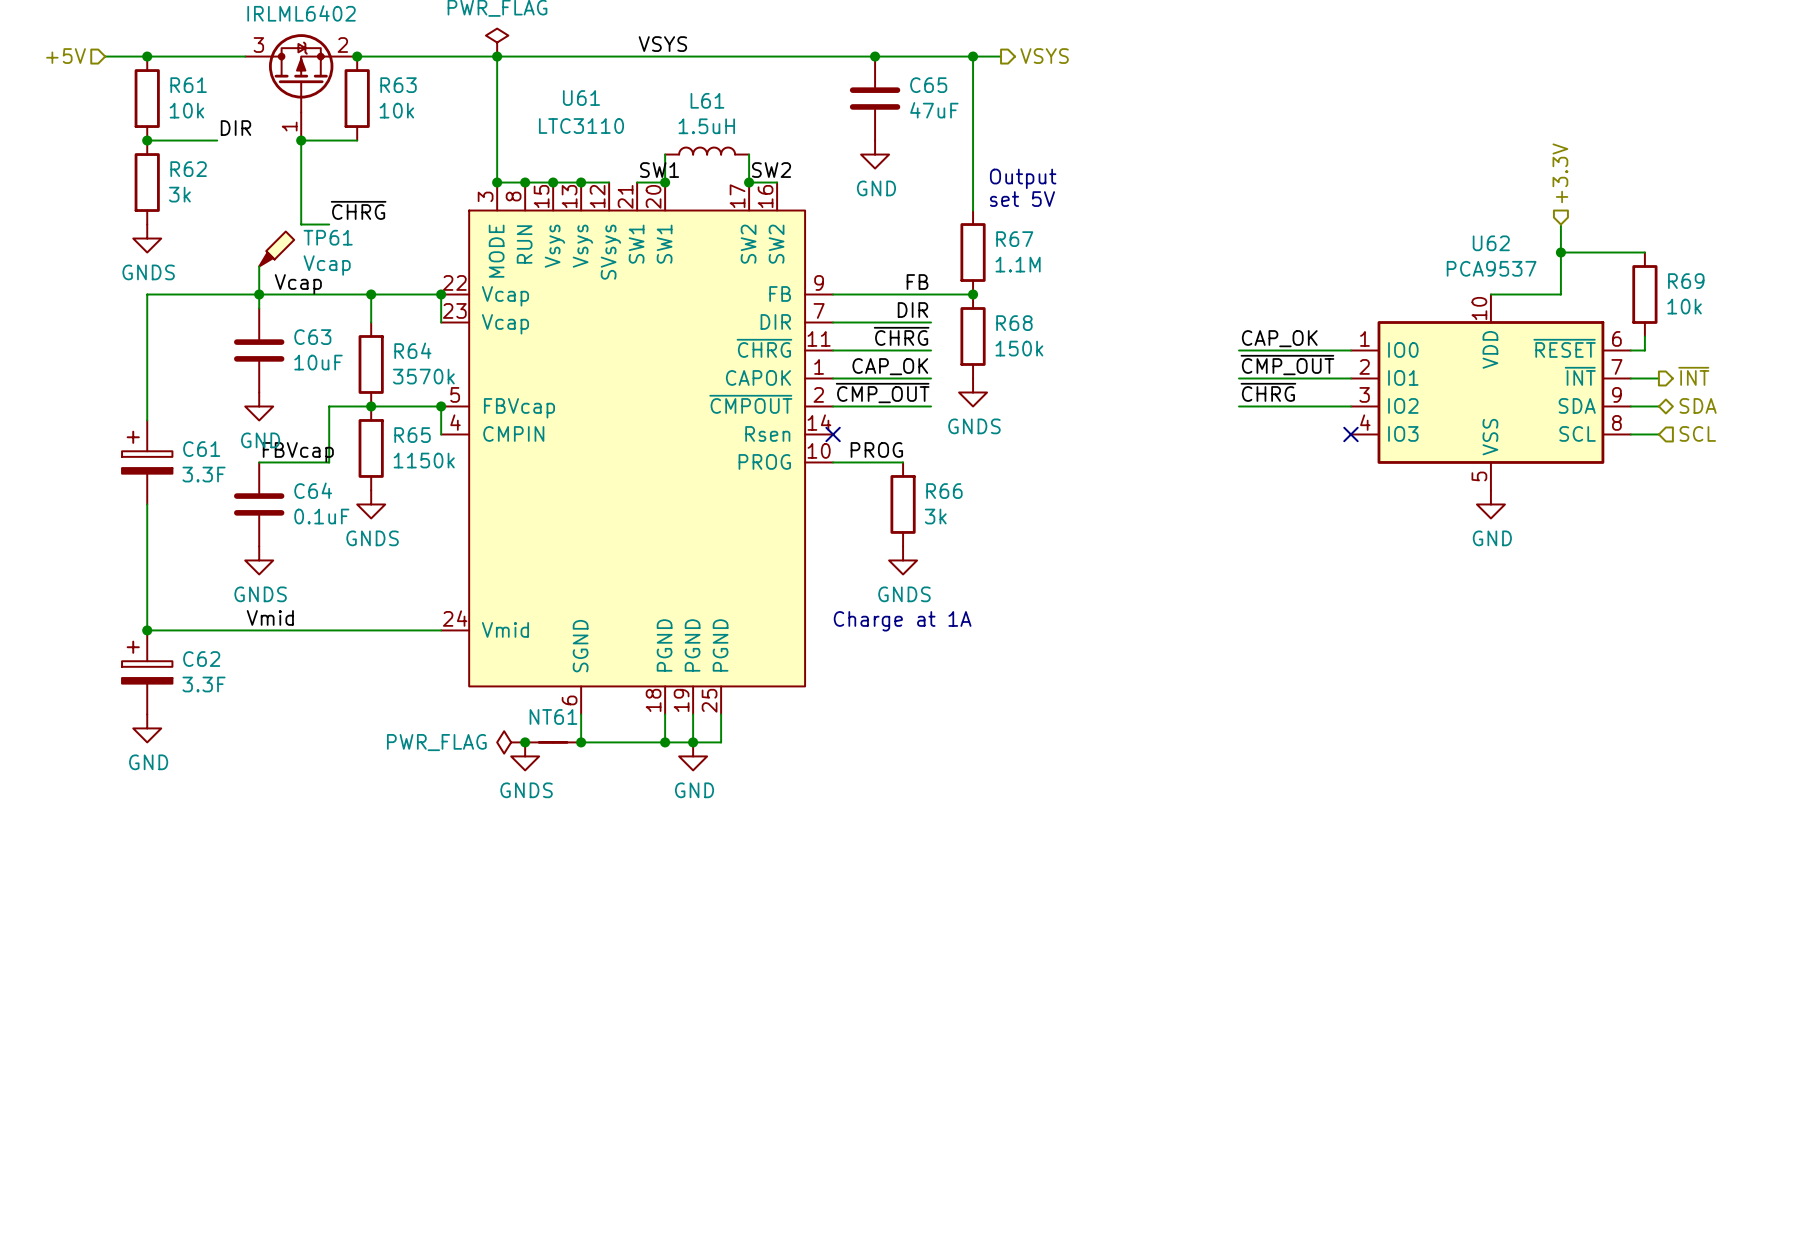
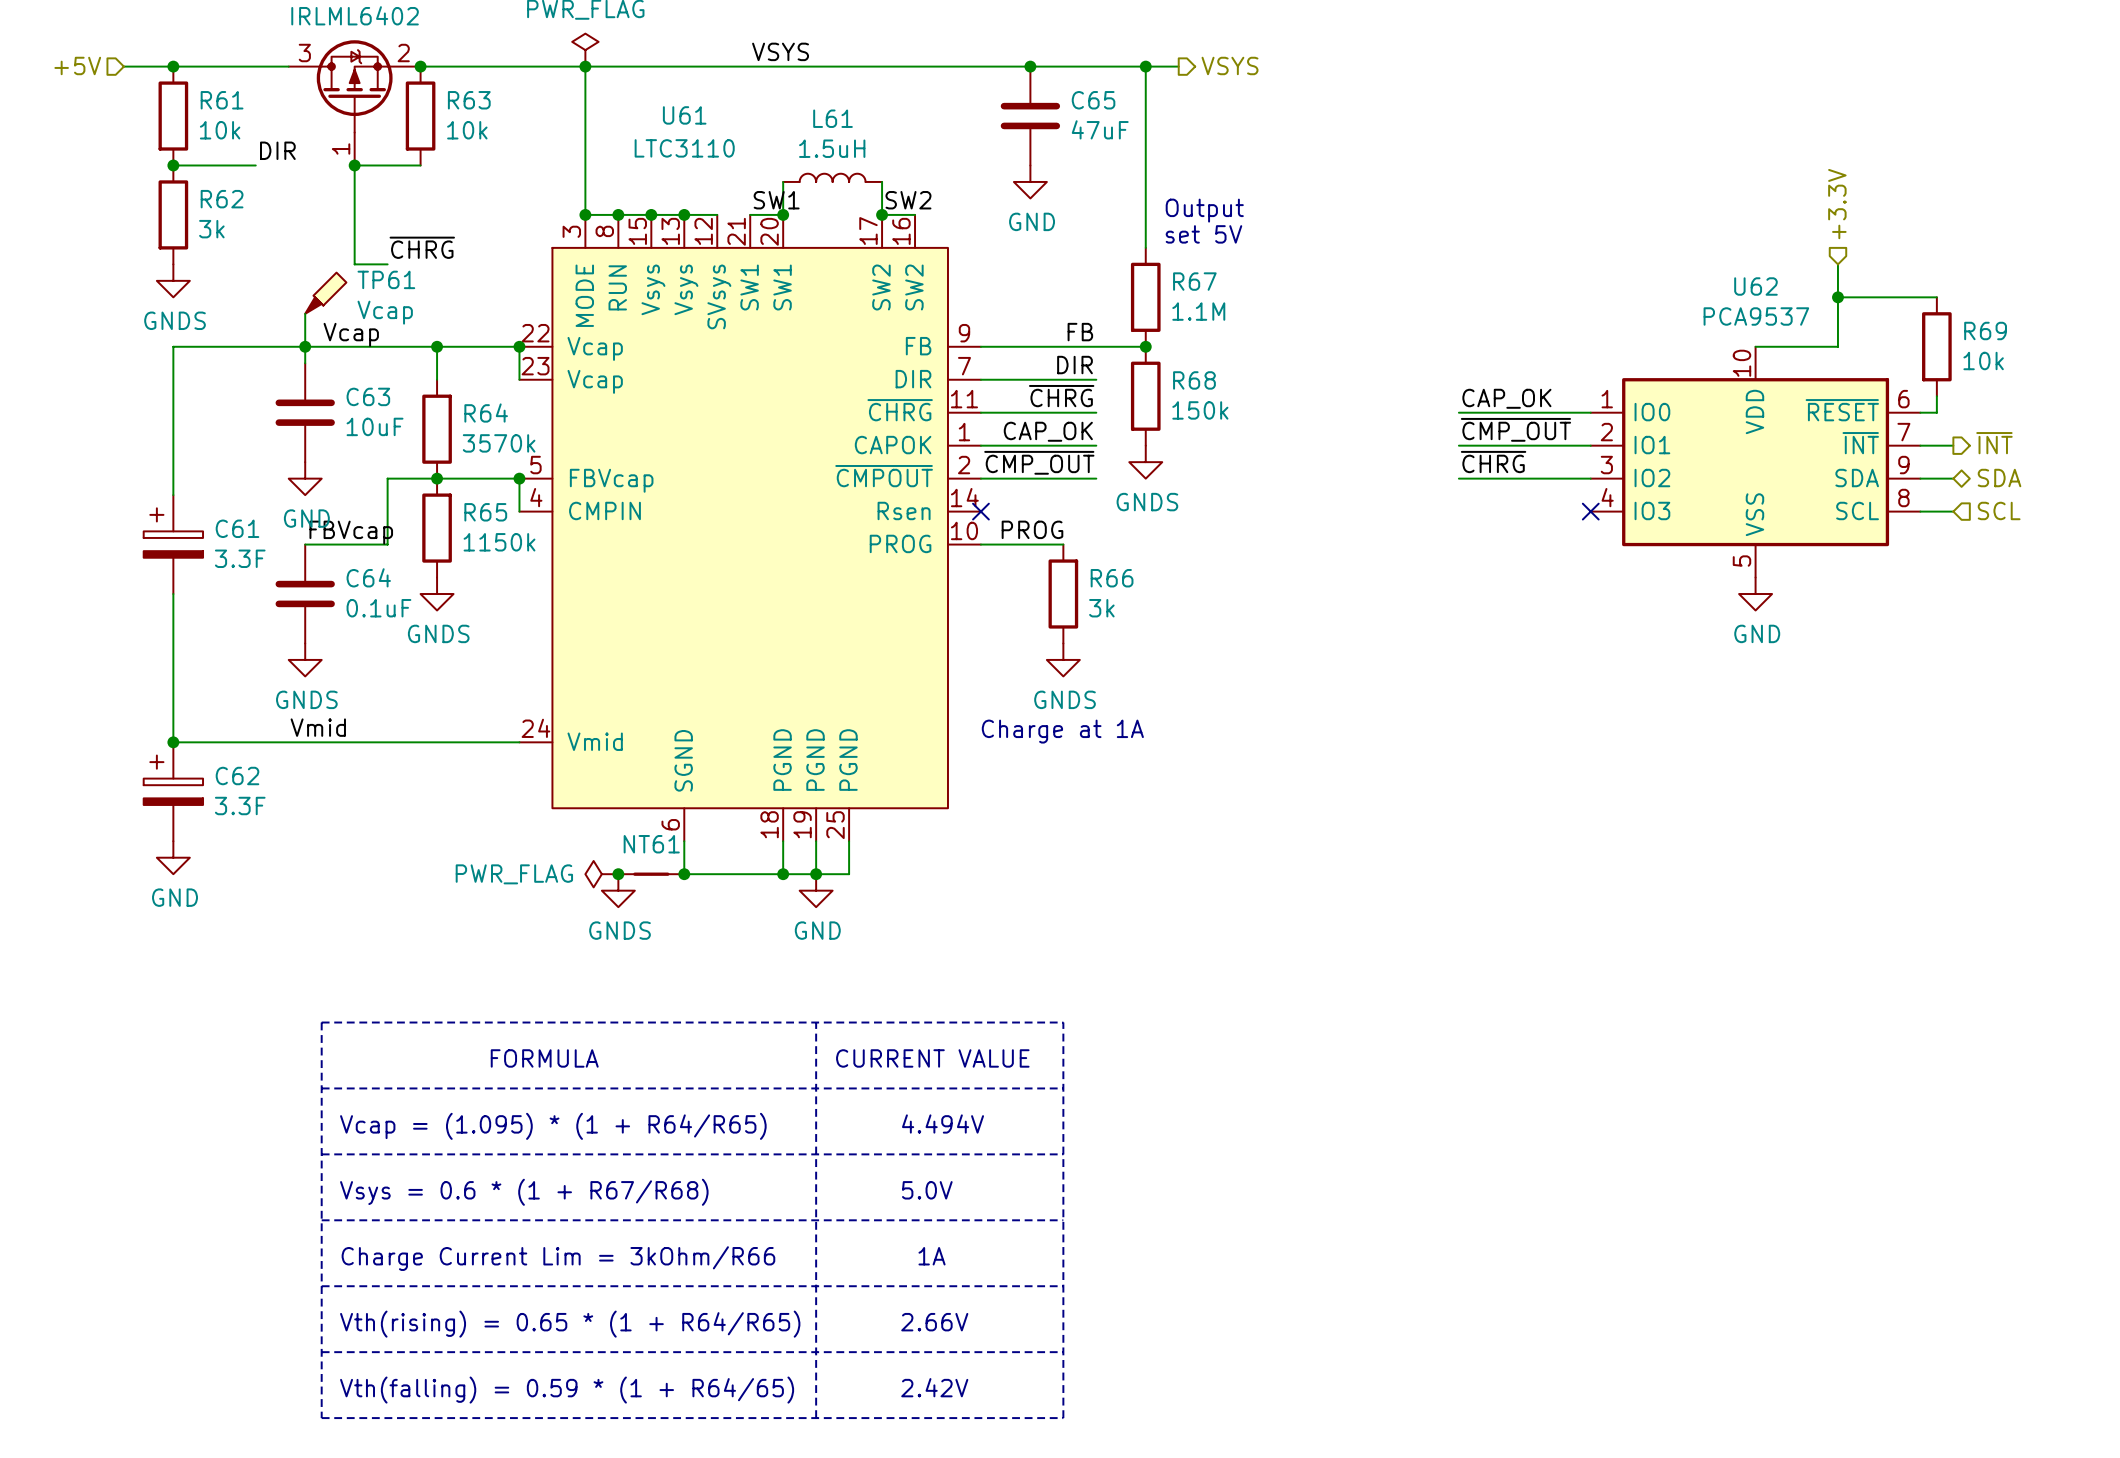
line: none -> (321, 1022) (321, 1418) (1063, 1418) (1063, 1022) (321, 1022)
line: none -> (816, 1022) (816, 1418)
text: none -> FORMULA (544, 1058)
text: none -> CURRENT VALUE (932, 1058)
line: none -> (321, 1088) (1063, 1088)
text: none -> 4.494V (943, 1123)
text: none -> Vcap = (1.095) * (1 + R64/R65) (553, 1126)
line: none -> (321, 1154) (1063, 1154)
text: none -> 5.0V (927, 1190)
text: none -> Vsys = 0.6 * (1 + R67/R68) (524, 1192)
line: none -> (321, 1220) (1063, 1220)
text: none -> 1A (932, 1256)
text: none -> Charge Current Lim = 3kOhm/R66 (558, 1258)
line: none -> (321, 1286) (1063, 1286)
text: none -> 2.66V (934, 1322)
text: none -> Vth(rising) = 0.65 * (1 + R64/R65) (570, 1324)
line: none -> (321, 1352) (1063, 1352)
text: none -> 2.42V (934, 1387)
text: none -> Vth(falling) = 0.59 * (1 + R64/65) (567, 1390)

